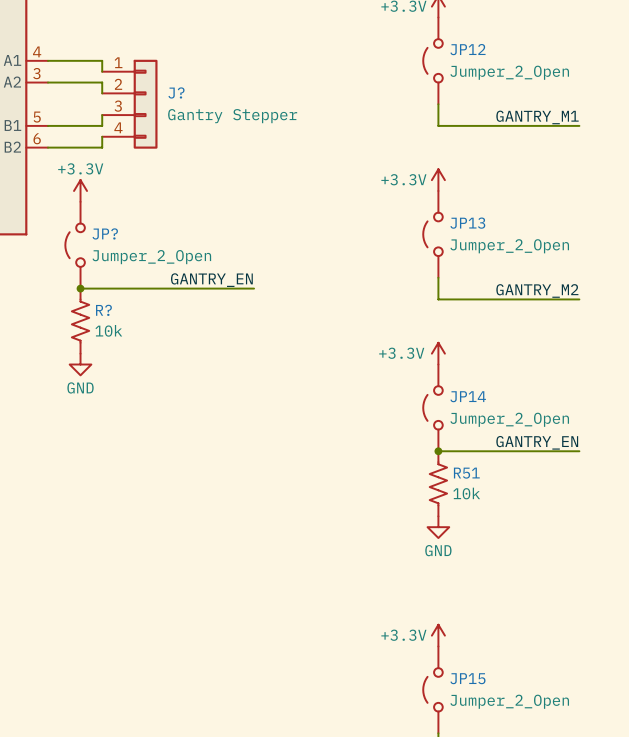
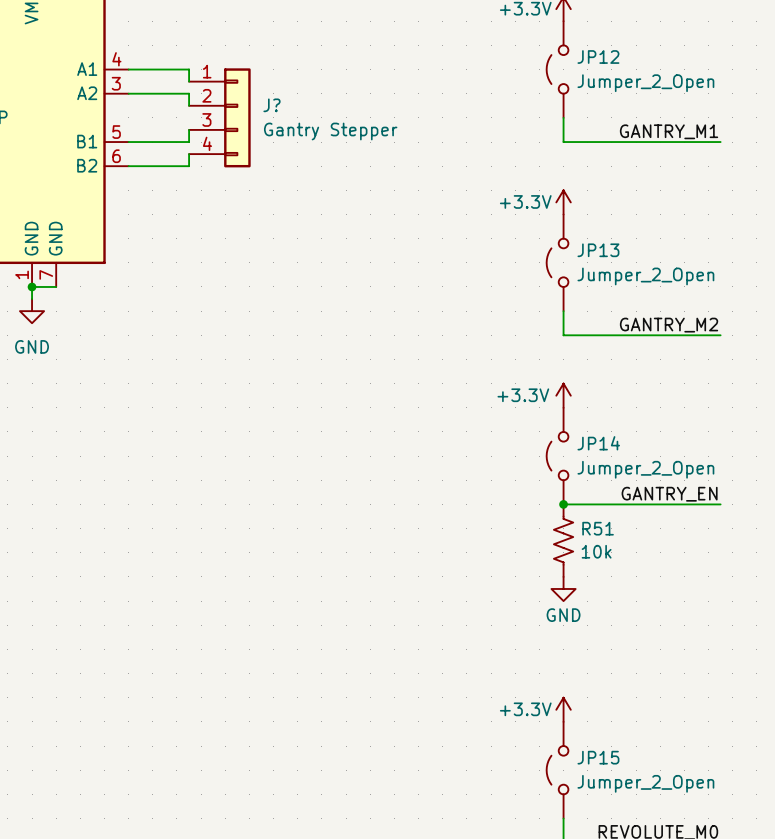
power symbol: +3.3V (80, 190) -> none
JP?: Jumper_2_Open (75, 245) -> none
label: GANTRY_EN (211, 280) -> none
wire: (80, 288) (254, 288) -> none
junction: (80, 288) -> none
R?: 10k (80, 321) -> none
power symbol: GND (80, 364) -> none

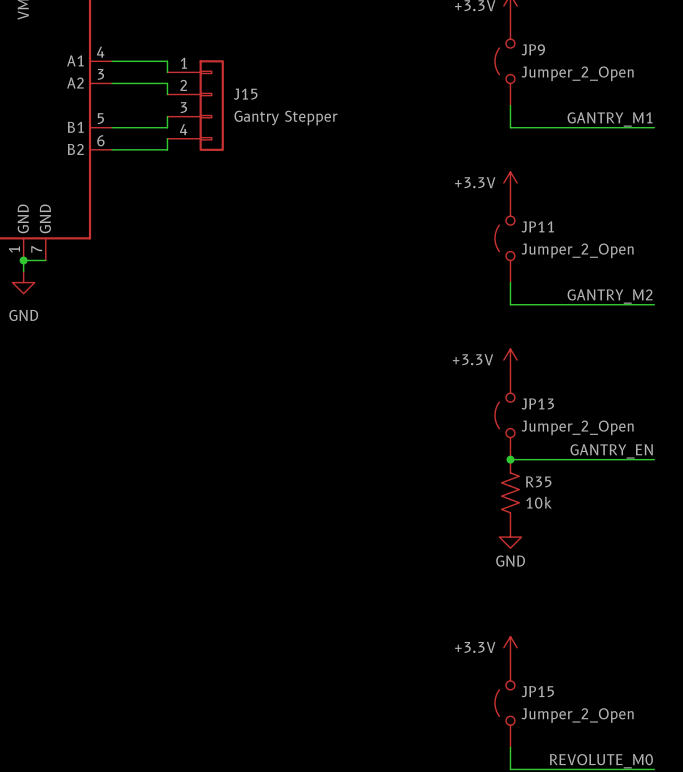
JP12 name: JP12 (598, 57) -> JP9 (533, 49)
J? name: J? (272, 105) -> J15 (245, 94)
JP13 name: JP13 (598, 250) -> JP11 (537, 226)
JP14 name: JP14 (598, 443) -> JP13 (537, 403)
R51 name: R51 (598, 528) -> R35 (538, 481)

